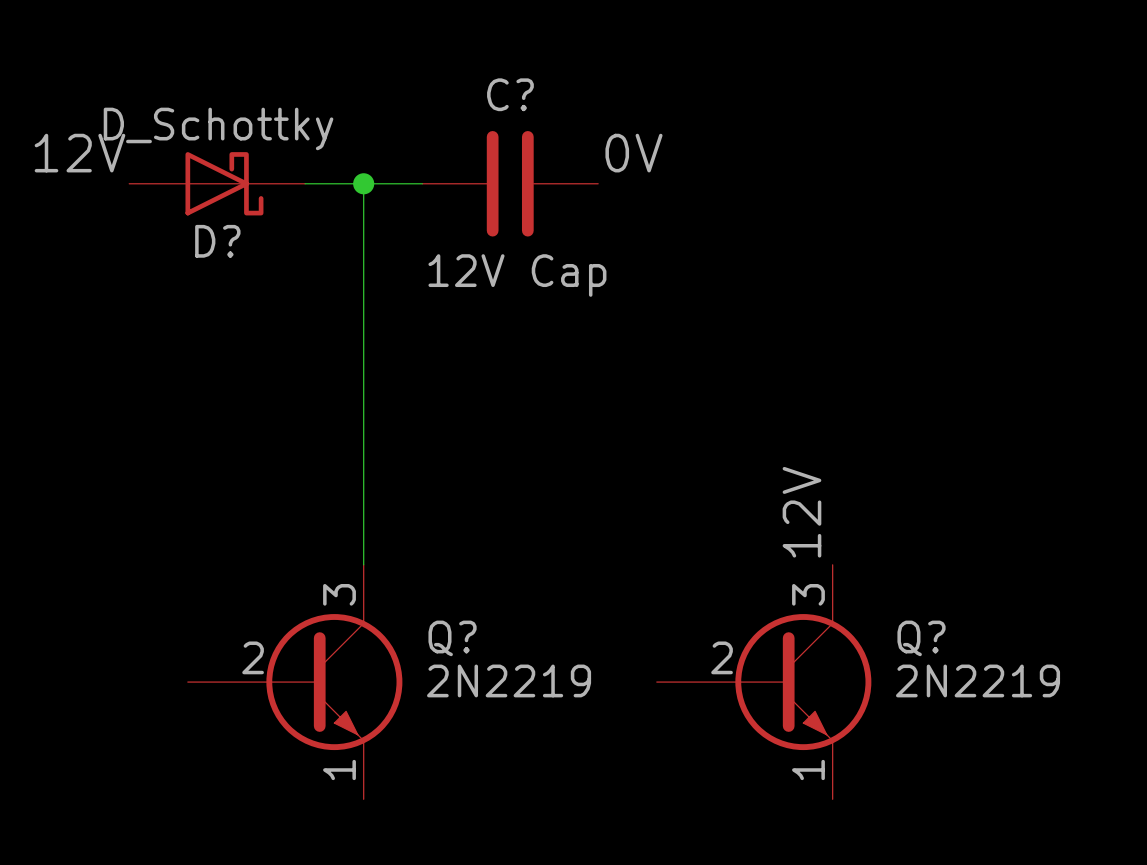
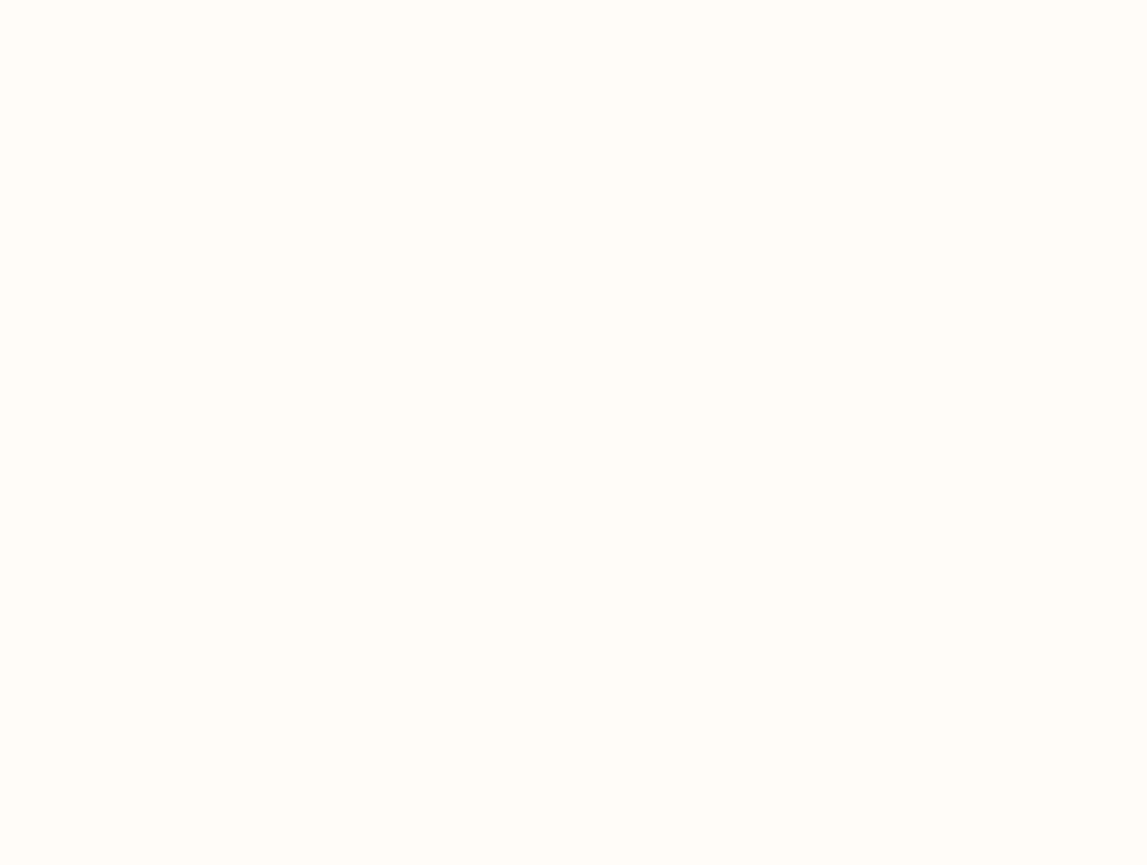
label: 12V (79, 153) -> none
label: 0V (633, 153) -> none
D?: D_Schottky (217, 183) -> none
wire: (305, 183) (422, 183) -> none
wire: (363, 183) (363, 564) -> none
junction: (363, 183) -> none
C?: 12V Cap (510, 183) -> none
label: 12V (801, 512) -> none
Q?: 2N2219 (295, 682) -> none
Q?: 2N2219 (764, 682) -> none

